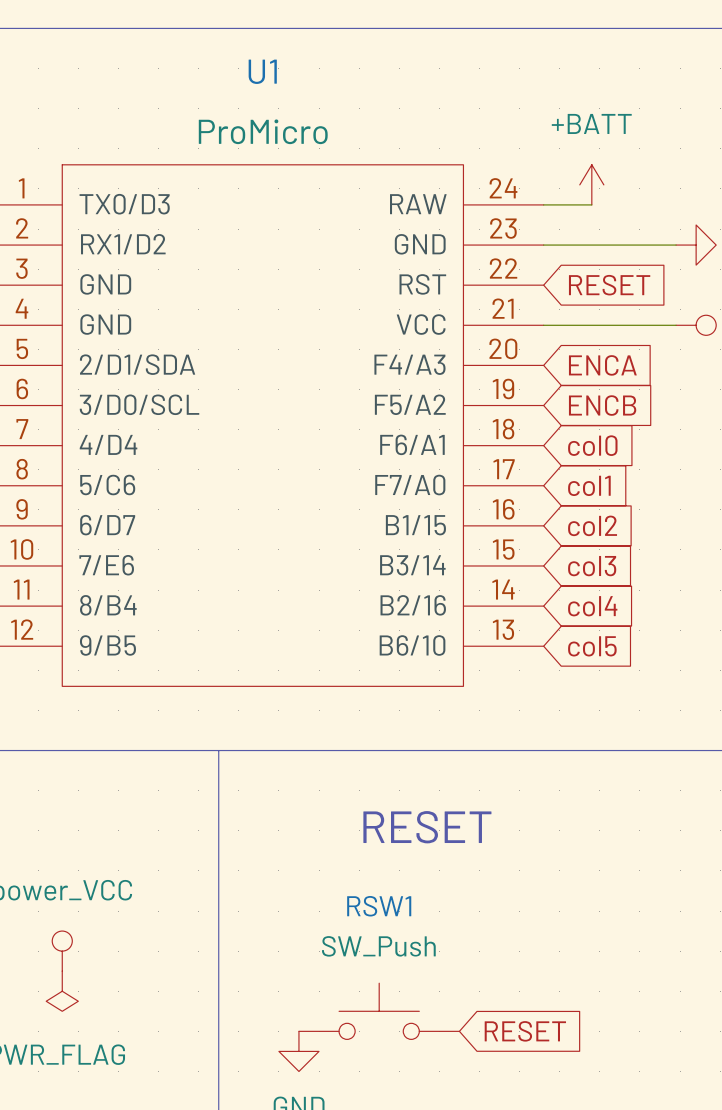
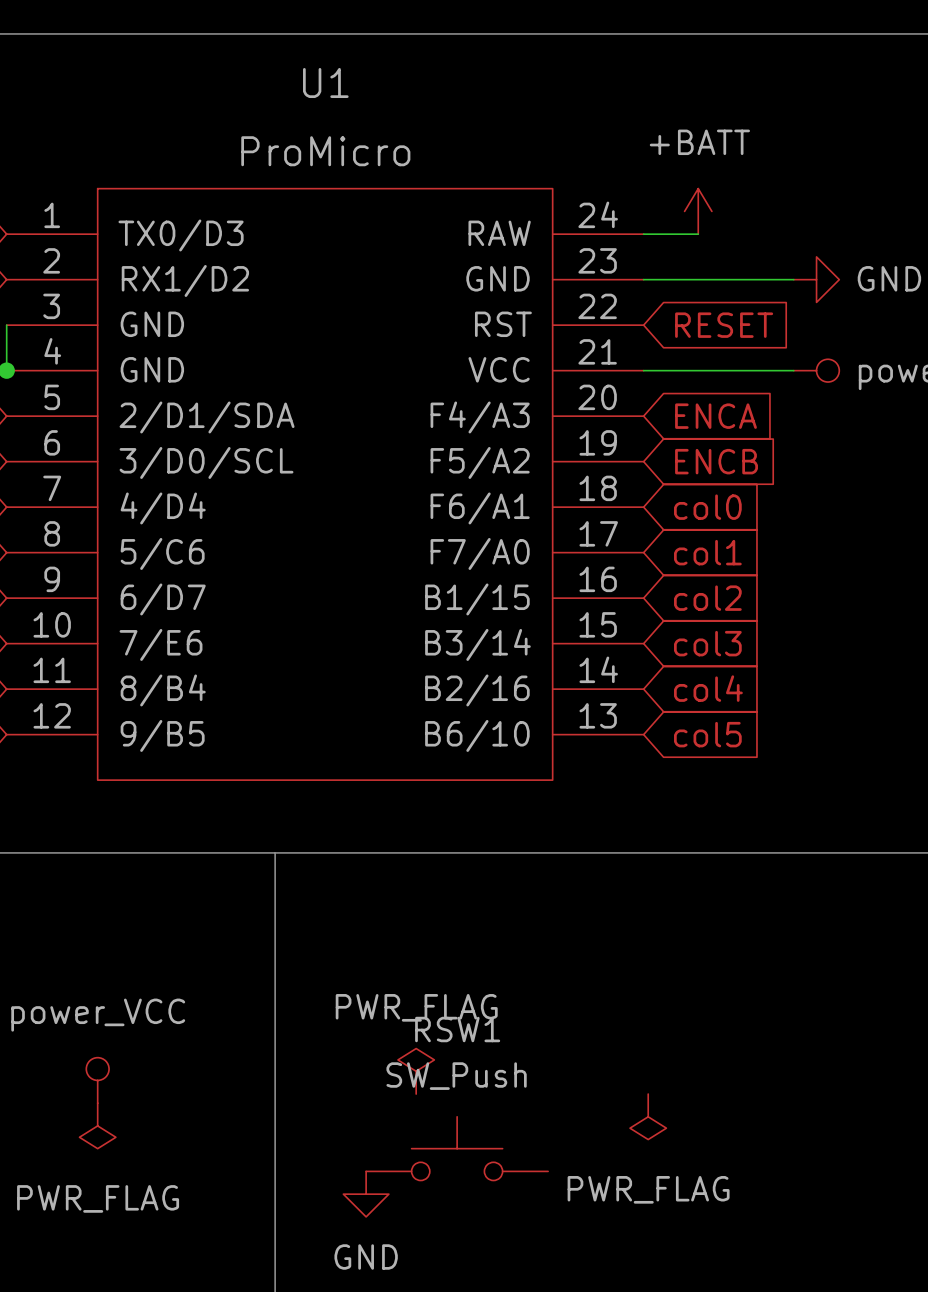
text: RESET (427, 827) -> none
power symbol: none -> PWR_FLAG (416, 1071)
power symbol: none -> PWR_FLAG (648, 1116)
global label: RESET (525, 1031) -> none

